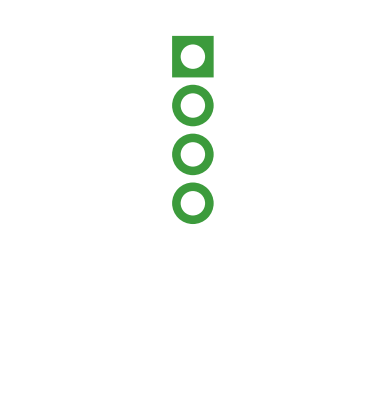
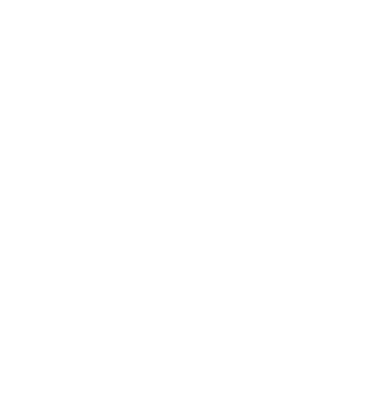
part: (192, 129) -> none

